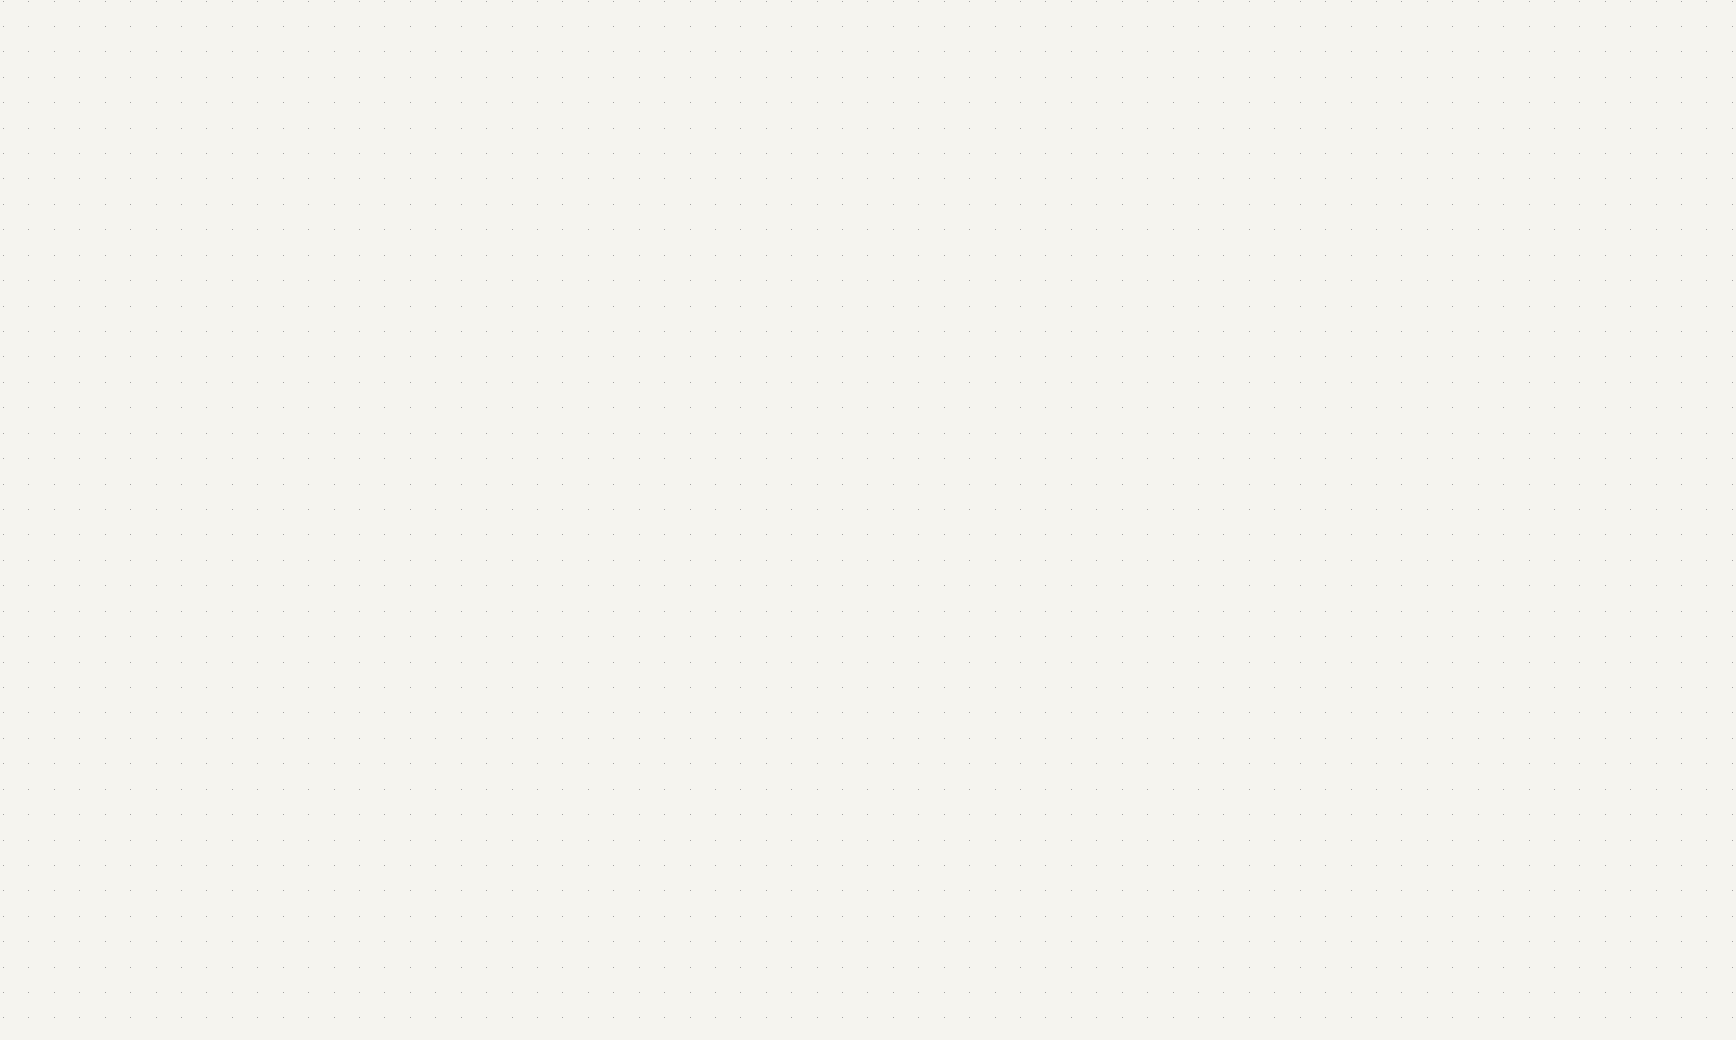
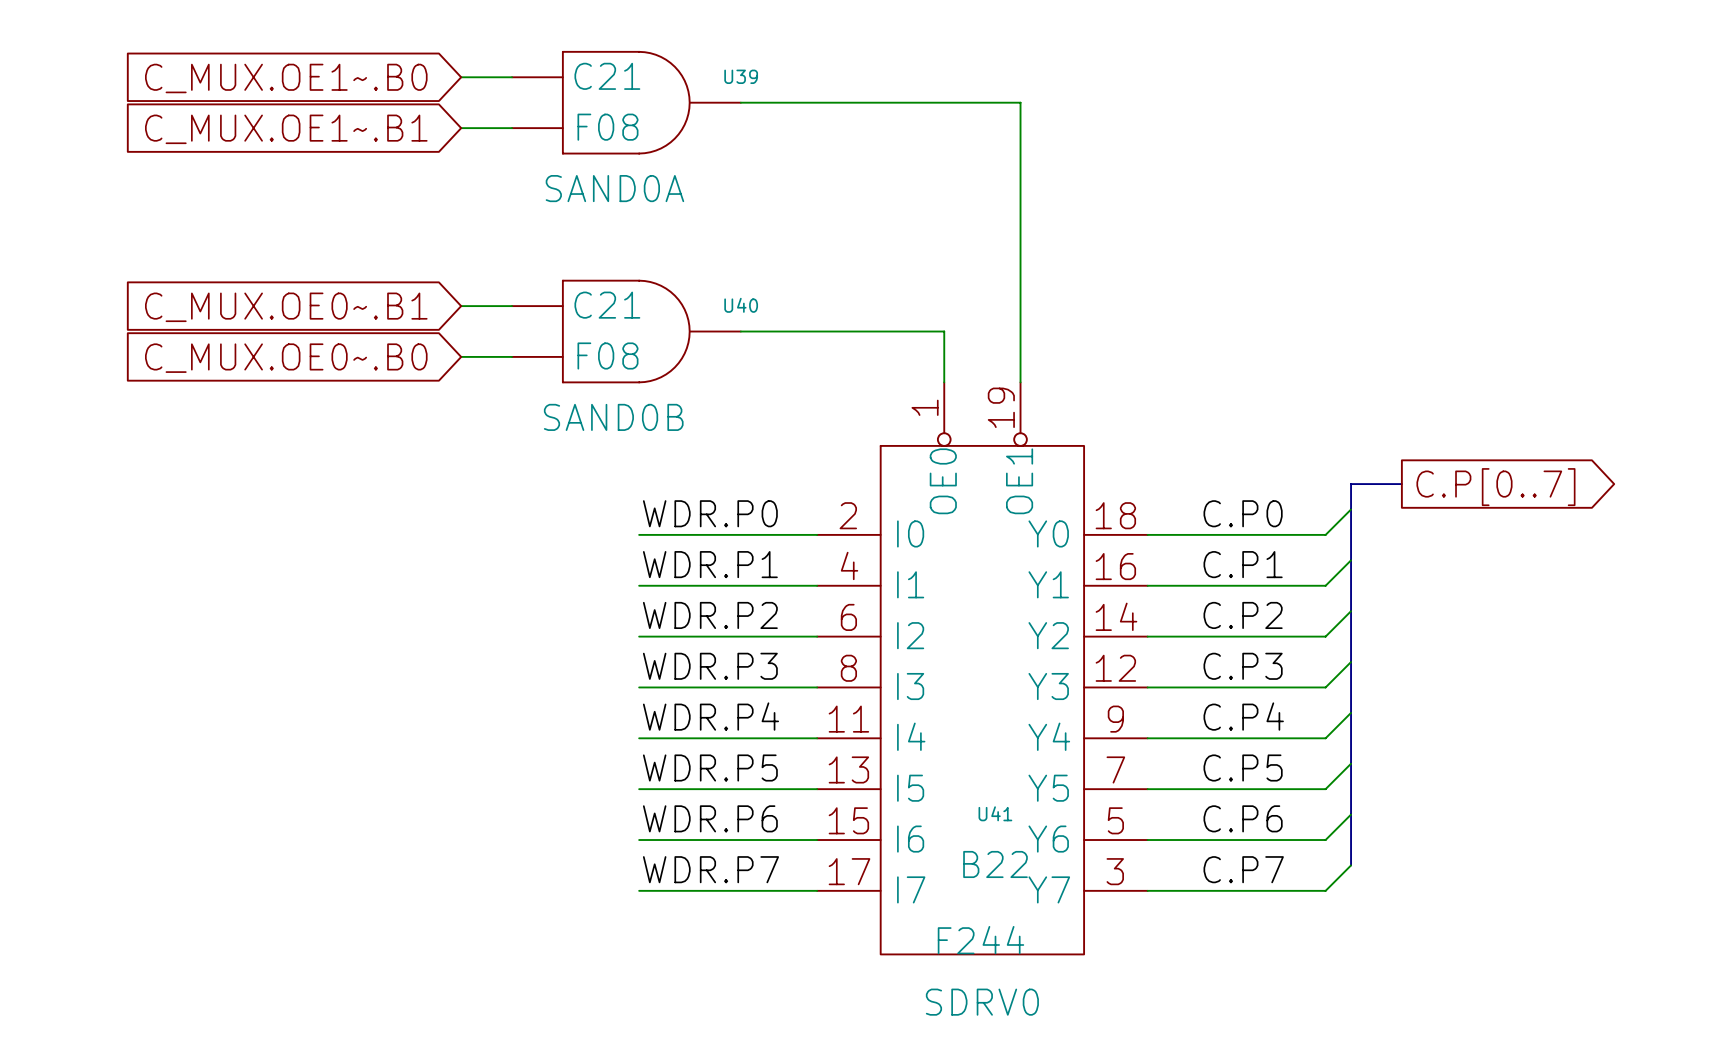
wire: none -> (461, 77) (512, 77)
global label: none -> C_MUX.OE1~.B0 (286, 78)
U39: none -> F08 (626, 102)
wire: none -> (740, 102) (1020, 102) (1020, 382)
wire: none -> (461, 128) (512, 128)
global label: none -> C_MUX.OE1~.B1 (286, 129)
wire: none -> (461, 306) (512, 306)
global label: none -> C_MUX.OE0~.B1 (286, 307)
U40: none -> F08 (626, 331)
wire: none -> (740, 331) (944, 331) (944, 382)
wire: none -> (461, 356) (512, 356)
global label: none -> C_MUX.OE0~.B0 (286, 358)
bus: none -> (1401, 484) (1351, 484) (1351, 865)
global label: none -> C.P[0..7] (1495, 487)
wire: none -> (1351, 509) (1325, 534) (1147, 534)
label: none -> WDR.P0 (710, 513)
label: none -> C.P0 (1243, 513)
wire: none -> (639, 534) (817, 534)
wire: none -> (1351, 560) (1325, 585) (1147, 585)
label: none -> WDR.P1 (710, 564)
label: none -> C.P1 (1243, 564)
wire: none -> (639, 585) (817, 585)
wire: none -> (1351, 611) (1325, 636) (1147, 636)
label: none -> WDR.P2 (710, 615)
label: none -> C.P2 (1243, 615)
wire: none -> (639, 636) (817, 636)
wire: none -> (1351, 662) (1325, 687) (1147, 687)
label: none -> WDR.P3 (710, 666)
label: none -> C.P3 (1243, 666)
U41: none -> F244 (982, 668)
wire: none -> (639, 687) (817, 687)
wire: none -> (1351, 712) (1325, 738) (1147, 738)
label: none -> WDR.P4 (710, 716)
label: none -> C.P4 (1243, 716)
wire: none -> (639, 738) (817, 738)
wire: none -> (1351, 763) (1325, 789) (1147, 789)
label: none -> WDR.P5 (710, 767)
label: none -> C.P5 (1243, 767)
wire: none -> (639, 789) (817, 789)
wire: none -> (1351, 814) (1325, 840) (1147, 840)
label: none -> WDR.P6 (710, 818)
label: none -> C.P6 (1243, 818)
wire: none -> (639, 840) (817, 840)
wire: none -> (1351, 865) (1325, 890) (1147, 890)
label: none -> WDR.P7 (710, 869)
label: none -> C.P7 (1243, 869)
wire: none -> (639, 890) (817, 890)

